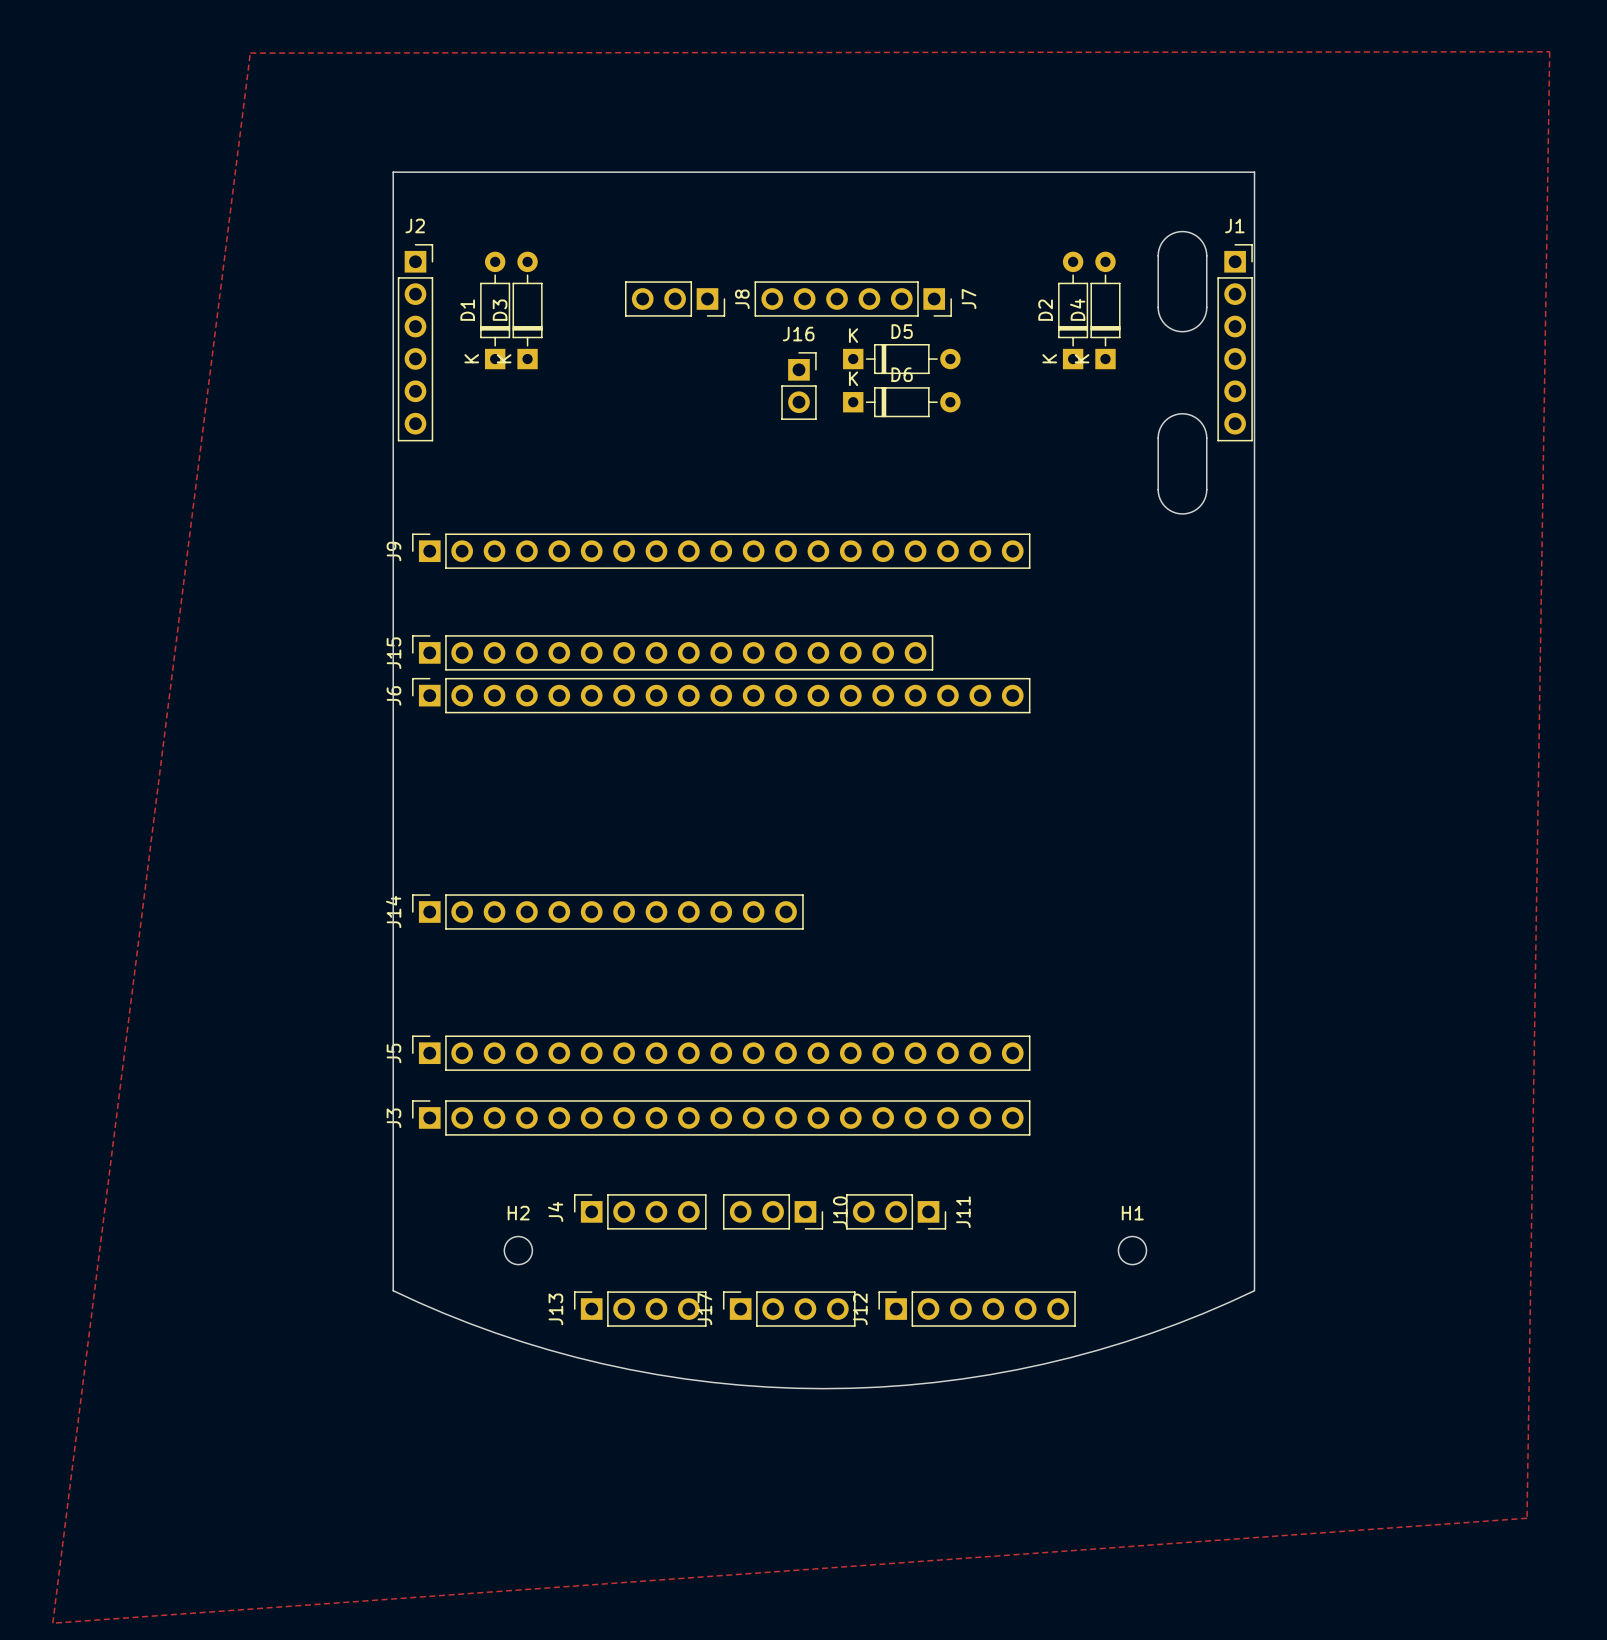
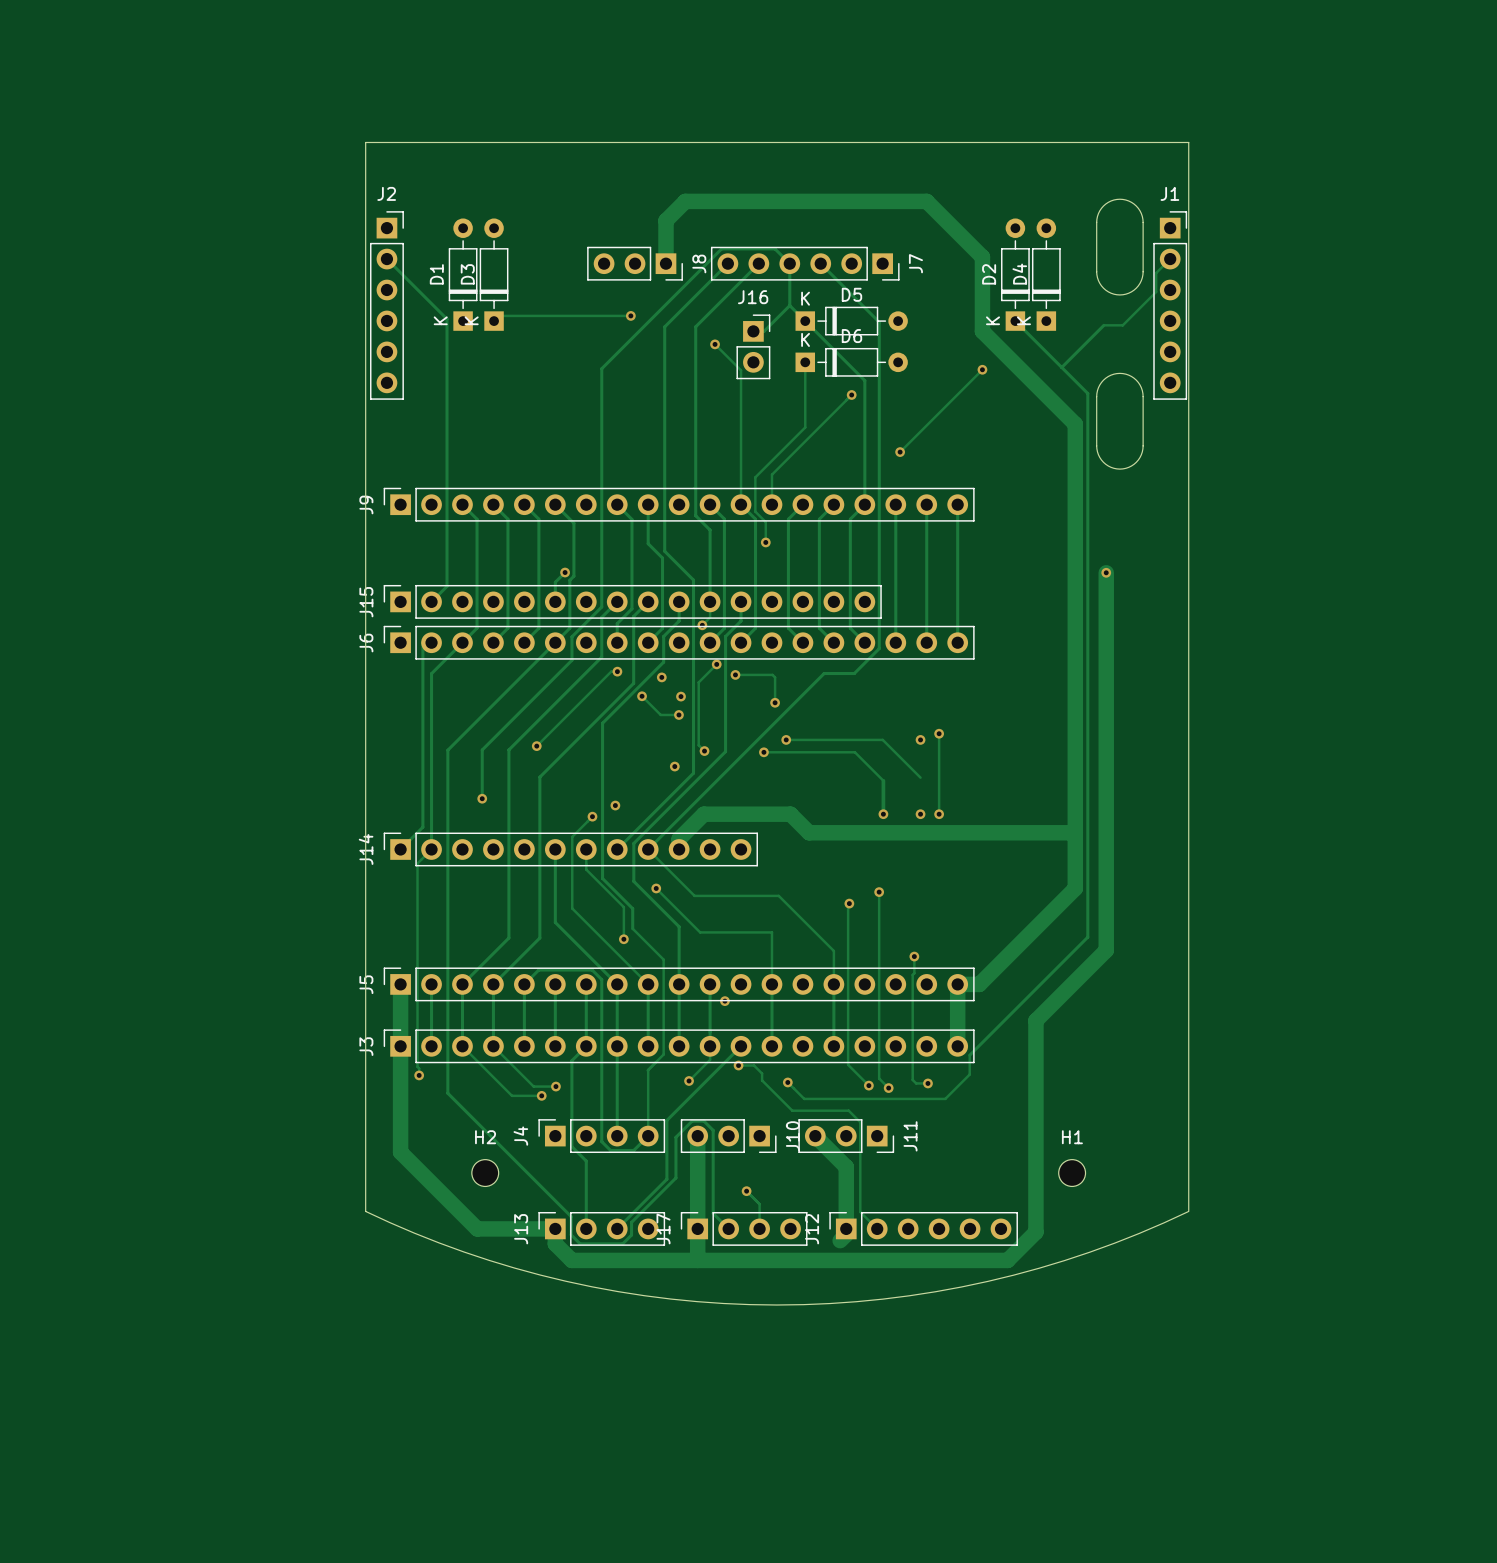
zone outline: (1549, 51) (250, 53) (52, 1623) (1527, 1518) (1549, 51) -> none
track: none -> (386, 259) (447, 319) (447, 586) (431, 601)
track: none -> (1170, 259) (1156, 273) (1156, 291) (1122, 325) (1103, 325) (1061, 367)
track: none -> (665, 263) (665, 220) (685, 201) (926, 201) (982, 257) (982, 331) (1075, 424) (1075, 888) (979, 984) (957, 984) (957, 1046)
track: none -> (727, 263) (664, 326) (664, 551) (693, 580) (693, 773) (617, 849)
track: none -> (758, 263) (695, 326) (695, 515) (710, 530) (710, 617) (702, 625)
track: none -> (820, 263) (879, 322) (879, 648) (854, 673) (824, 673) (648, 849) (694, 895) (778, 895) (833, 950) (833, 1046)
track: none -> (789, 305) (864, 380) (864, 504) (850, 519) (850, 628) (864, 642)
track: none -> (789, 305) (789, 263) (775, 248) (721, 248) (601, 368) (601, 607) (571, 636) (571, 660) (482, 750) (482, 798)
track: none -> (789, 305) (764, 331) (753, 331)
track: none -> (630, 315) (499, 315) (494, 321)
via: none -> (630, 315)
track: none -> (1015, 321) (1087, 393) (1087, 937) (969, 1055) (969, 1074) (945, 1098) (804, 1098) (787, 1082)
track: none -> (715, 344) (741, 370) (741, 504) (755, 519) (755, 628) (741, 642)
via: none -> (715, 344)
track: none -> (805, 362) (805, 427) (755, 477) (755, 511) (765, 522) (765, 542)
track: none -> (982, 369) (900, 452)
via: none -> (982, 369)
track: none -> (851, 394) (771, 474) (771, 504)
via: none -> (851, 394)
via: none -> (900, 452)
track: none -> (462, 504) (477, 519) (477, 628) (431, 673) (431, 849) (417, 863) (417, 1066) (419, 1075)
track: none -> (493, 504) (507, 519) (507, 628) (493, 642)
track: none -> (524, 504) (538, 519) (538, 628) (524, 642)
track: none -> (555, 504) (573, 523) (573, 576) (569, 580) (569, 628) (447, 750) (447, 1093) (571, 1216) (571, 1234) (580, 1243) (622, 1243) (631, 1235) (631, 1222) (675, 1177) (675, 1137) (692, 1121) (703, 1121) (713, 1130) (713, 1213) (728, 1228)
track: none -> (617, 504) (631, 519) (631, 608) (617, 623) (617, 642)
track: none -> (648, 504) (648, 543) (662, 558) (662, 628) (648, 642)
track: none -> (710, 504) (724, 519) (724, 628) (710, 642)
track: none -> (802, 504) (788, 519) (788, 628) (802, 642)
track: none -> (833, 504) (819, 519) (819, 628) (833, 642)
track: none -> (895, 504) (895, 642)
track: none -> (926, 504) (926, 642)
track: none -> (957, 504) (957, 642)
via: none -> (765, 542)
track: none -> (565, 572) (555, 582) (555, 601)
via: none -> (565, 572)
track: none -> (1106, 572) (1106, 950) (1035, 1020) (1035, 1232) (1007, 1260) (571, 1260) (555, 1243) (555, 1228) (477, 1228) (400, 1152) (400, 984)
via: none -> (1106, 572)
track: none -> (617, 601) (601, 617) (601, 657) (508, 749) (508, 937) (462, 984) (462, 1046) (512, 1095) (541, 1095)
track: none -> (648, 601) (633, 616) (633, 683) (539, 777) (539, 937) (493, 984) (493, 1046) (533, 1086) (555, 1086)
track: none -> (679, 601) (679, 621) (663, 636) (663, 662) (602, 723) (602, 878) (632, 908) (632, 928) (663, 959) (663, 1054) (647, 1070)
track: none -> (741, 601) (741, 621) (725, 636) (725, 751) (633, 843) (633, 881) (679, 926) (679, 1046)
via: none -> (702, 625)
track: none -> (431, 642) (422, 642) (422, 827) (400, 849)
track: none -> (716, 664) (698, 682) (698, 745) (704, 751)
via: none -> (716, 664)
track: none -> (617, 671) (611, 671) (536, 746)
via: none -> (617, 671)
track: none -> (735, 674) (772, 674) (775, 677) (775, 702)
via: none -> (735, 674)
via: none -> (661, 677)
track: none -> (642, 696) (660, 714) (678, 714)
via: none -> (642, 696)
via: none -> (680, 696)
via: none -> (775, 702)
via: none -> (678, 714)
track: none -> (939, 733) (939, 814)
via: none -> (939, 733)
track: none -> (786, 739) (882, 739) (920, 777)
via: none -> (786, 739)
via: none -> (920, 739)
via: none -> (536, 746)
via: none -> (704, 751)
track: none -> (763, 752) (854, 752) (883, 780) (883, 814)
via: none -> (763, 752)
via: none -> (674, 766)
via: none -> (482, 798)
via: none -> (615, 805)
via: none -> (883, 814)
via: none -> (920, 814)
via: none -> (939, 814)
track: none -> (592, 816) (572, 836) (572, 908) (648, 984) (648, 1046)
via: none -> (592, 816)
track: none -> (1075, 832) (809, 832) (790, 814) (703, 814) (679, 838) (679, 849)
track: none -> (555, 849) (555, 922) (617, 984) (617, 1136)
track: none -> (586, 849) (586, 869) (623, 907) (623, 939)
track: none -> (656, 888) (700, 932) (771, 932) (771, 1046)
via: none -> (656, 888)
track: none -> (879, 892) (879, 1078) (888, 1088)
via: none -> (879, 892)
track: none -> (849, 903) (848, 1064) (868, 1085)
via: none -> (849, 903)
via: none -> (623, 939)
track: none -> (914, 956) (912, 1079) (916, 1083) (927, 1083)
via: none -> (914, 956)
track: none -> (431, 984) (431, 1046)
track: none -> (555, 984) (555, 1046)
track: none -> (586, 984) (586, 1046) (571, 1060) (571, 1146) (586, 1161) (586, 1228)
track: none -> (710, 984) (710, 1059) (689, 1080)
via: none -> (724, 1001)
track: none -> (524, 1046) (524, 984) (538, 970) (592, 970) (601, 979) (601, 1141) (610, 1150) (633, 1150) (648, 1136) (648, 1069)
track: none -> (741, 1046) (666, 1120) (666, 1179) (617, 1228)
track: none -> (738, 1065) (754, 1065) (762, 1073) (762, 1080) (792, 1110) (848, 1110) (860, 1122) (860, 1212) (877, 1228)
via: none -> (738, 1065)
via: none -> (419, 1075)
via: none -> (689, 1080)
via: none -> (787, 1082)
via: none -> (927, 1083)
via: none -> (868, 1085)
via: none -> (555, 1086)
via: none -> (888, 1088)
via: none -> (541, 1095)
track: none -> (697, 1136) (697, 1257)
track: none -> (815, 1136) (846, 1167) (846, 1234) (840, 1241)
track: none -> (746, 1191) (759, 1204) (759, 1228)
via: none -> (746, 1191)

